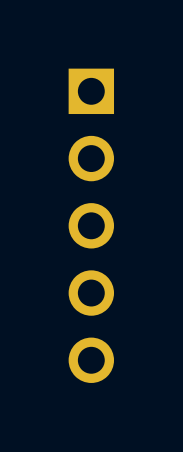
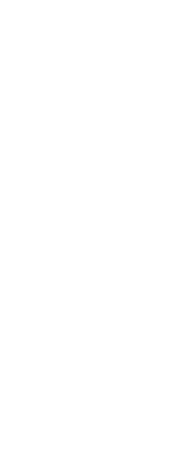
part: (91, 225) -> none

